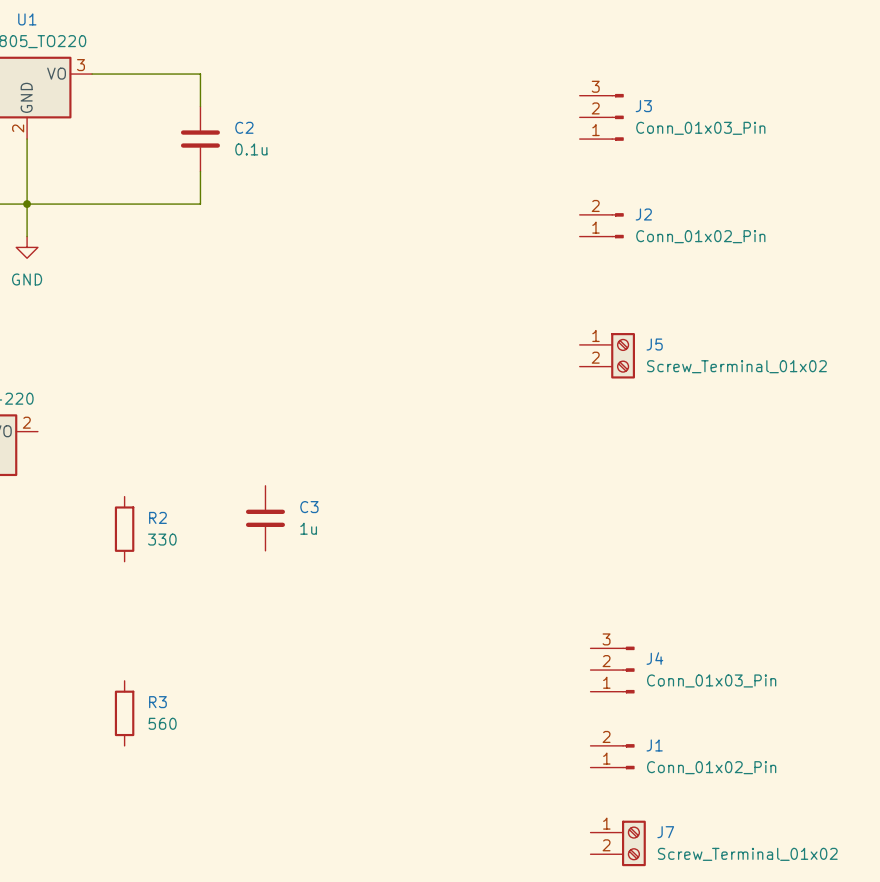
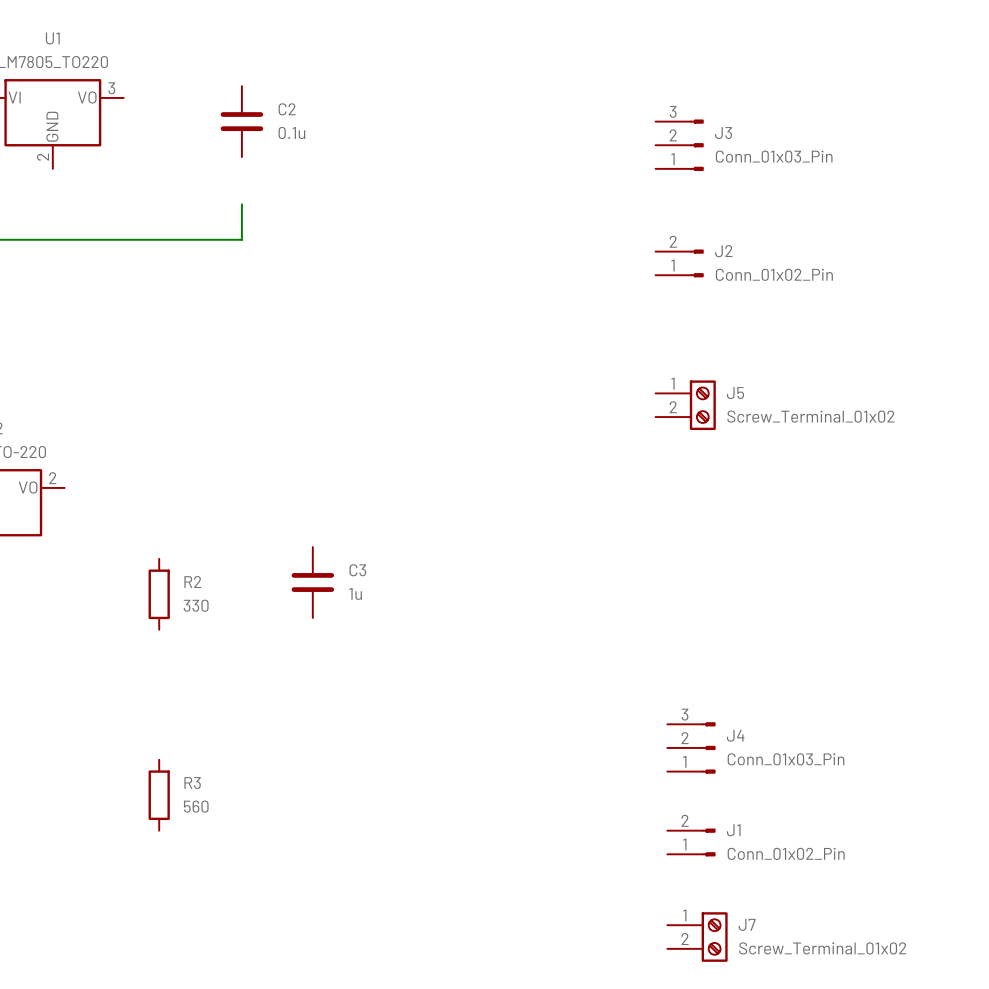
wire: (92, 74) (200, 74) (200, 106) -> none
wire: (27, 139) (27, 236) -> none
C2 position: (200, 139) -> (241, 121)
junction: (27, 204) -> none
power symbol: GND (27, 247) -> none

